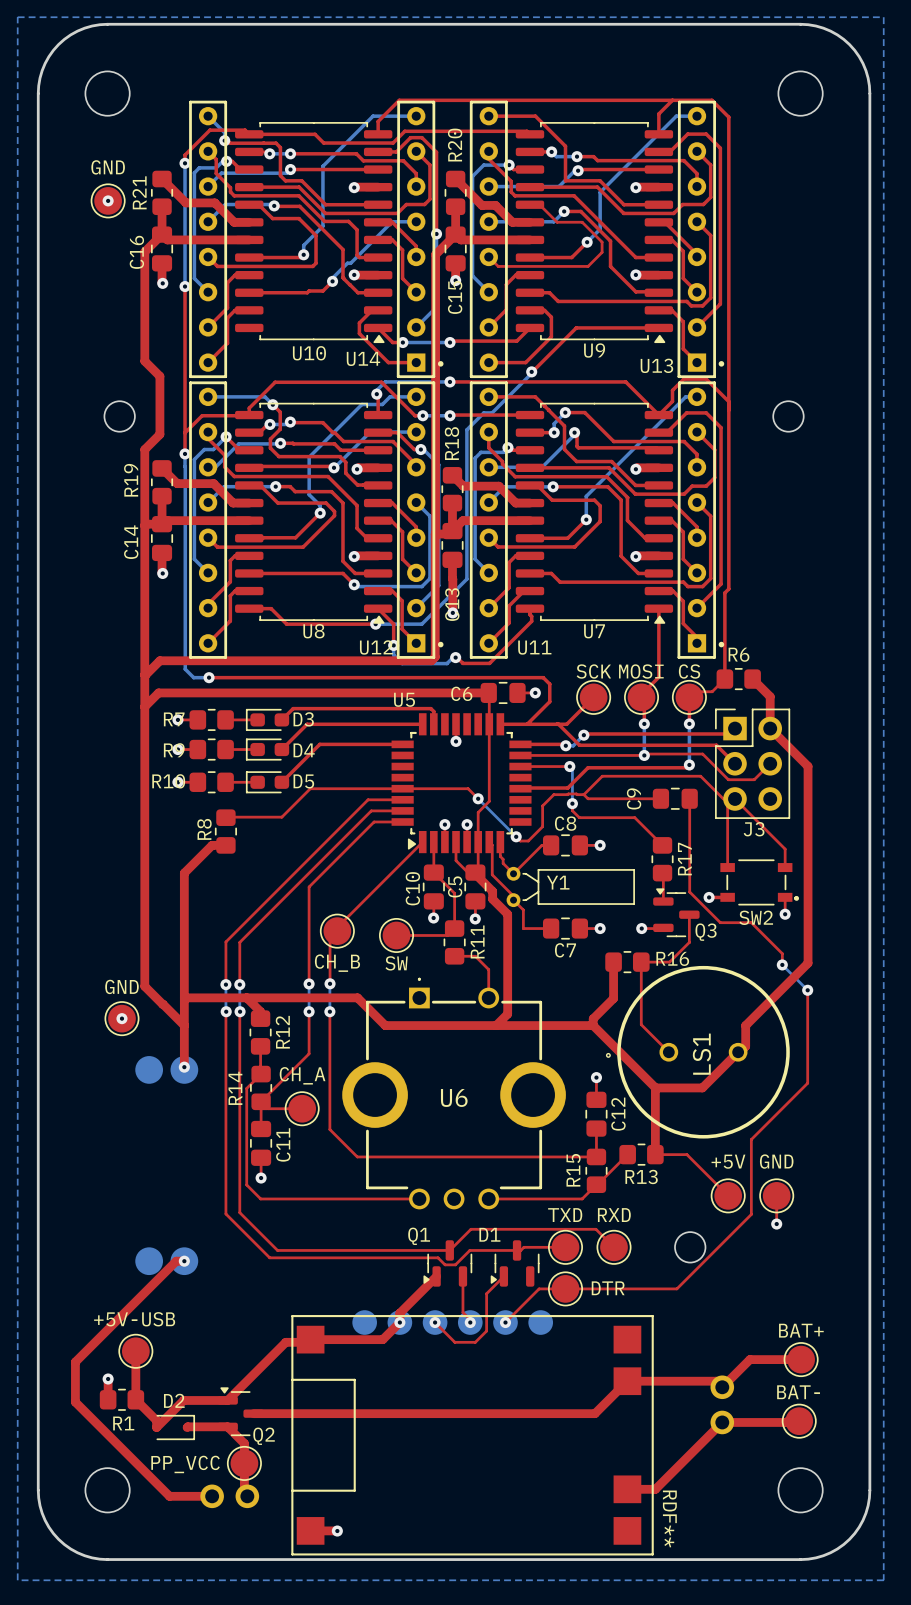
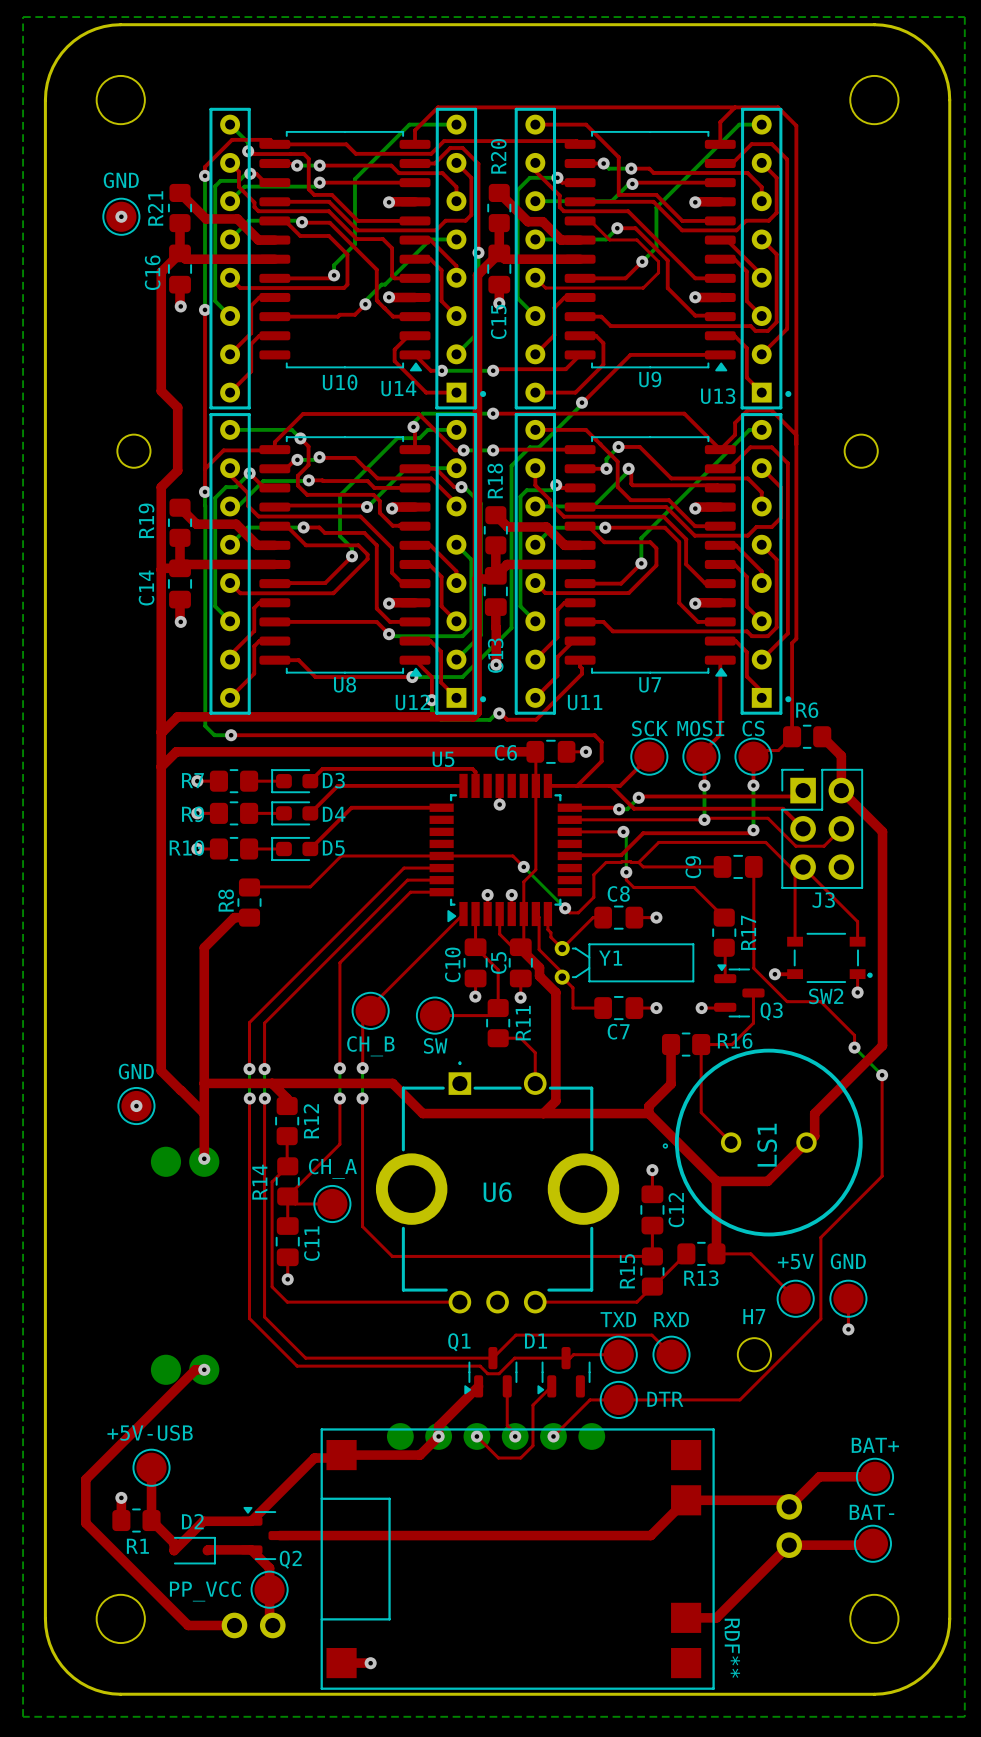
H7 name: none -> H7 (754, 1316)

